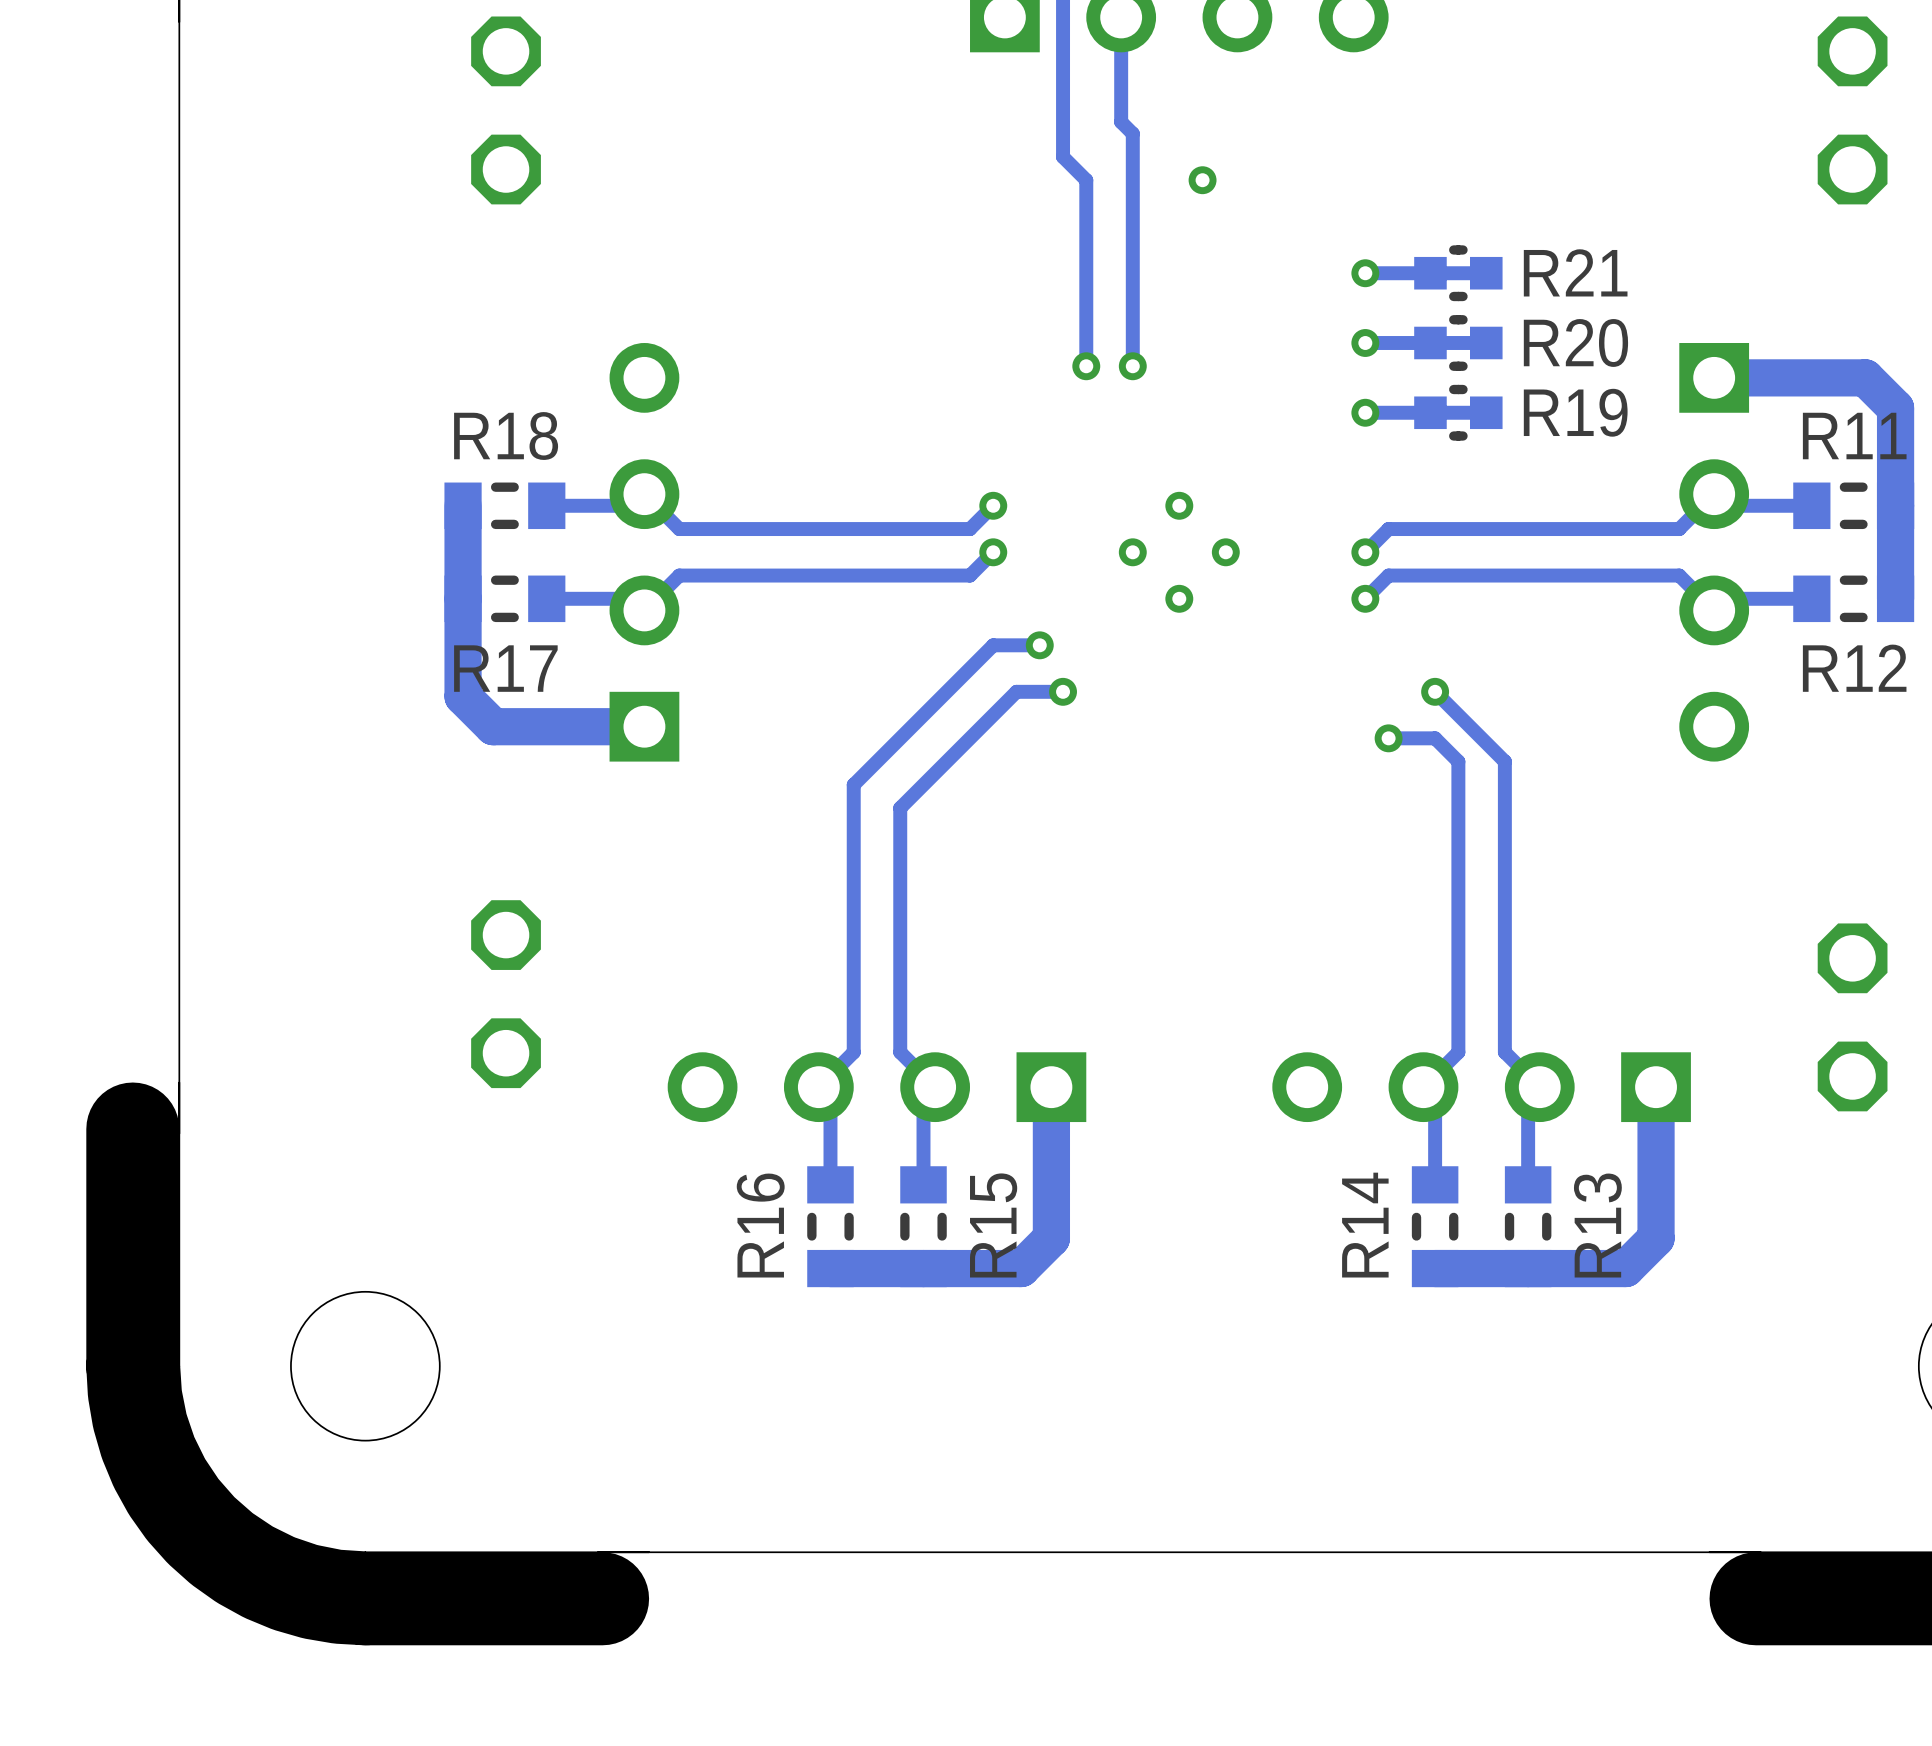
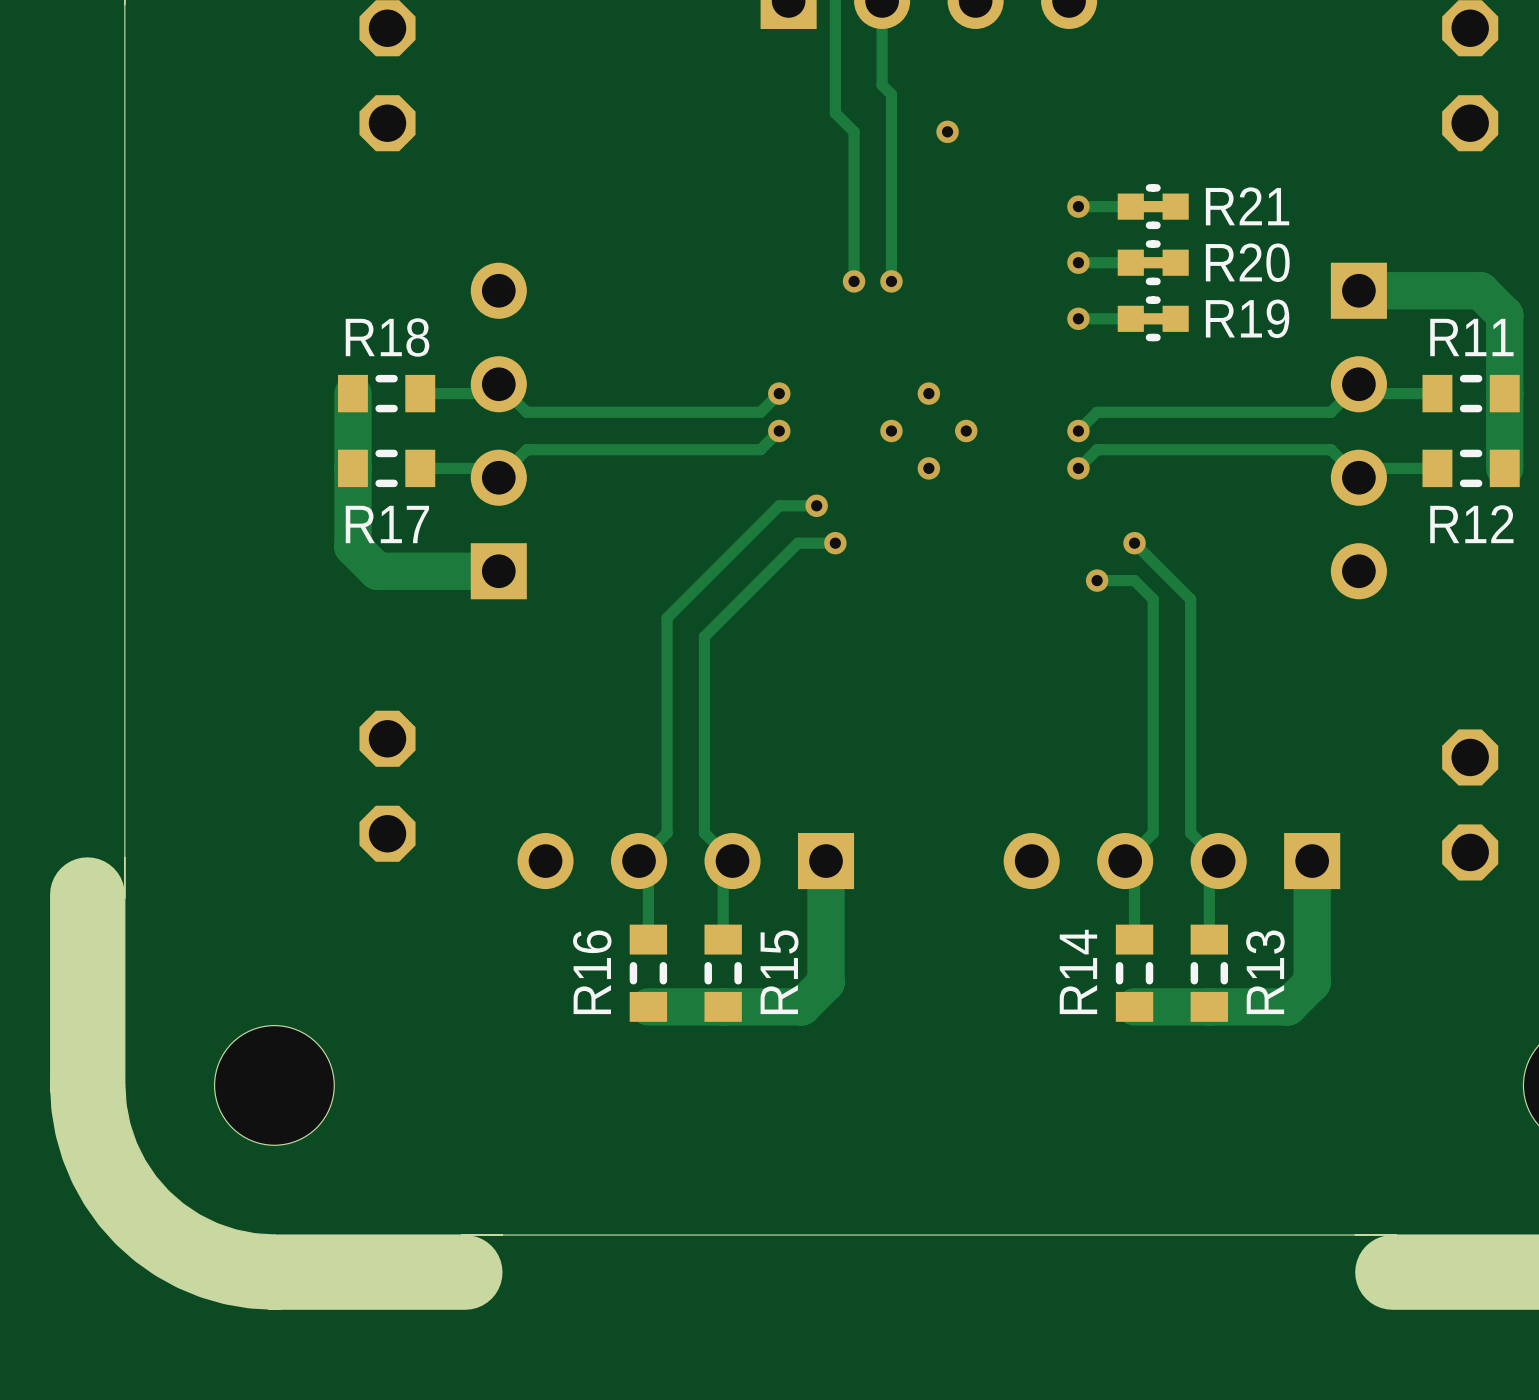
track width: thin (1714, 377) (1865, 377) (1895, 408) (1895, 598) -> thick (1358, 290) (1480, 290) (1504, 315) (1504, 468)
track width: thin (463, 505) (463, 696) (493, 726) (644, 726) -> thick (352, 393) (352, 546) (377, 571) (498, 571)
track width: thin (1051, 1087) (1051, 1238) (1021, 1268) (830, 1268) -> thick (826, 861) (826, 982) (801, 1006) (648, 1006)
track width: thin (1656, 1087) (1656, 1238) (1625, 1268) (1435, 1268) -> thick (1312, 861) (1312, 982) (1287, 1006) (1134, 1006)

